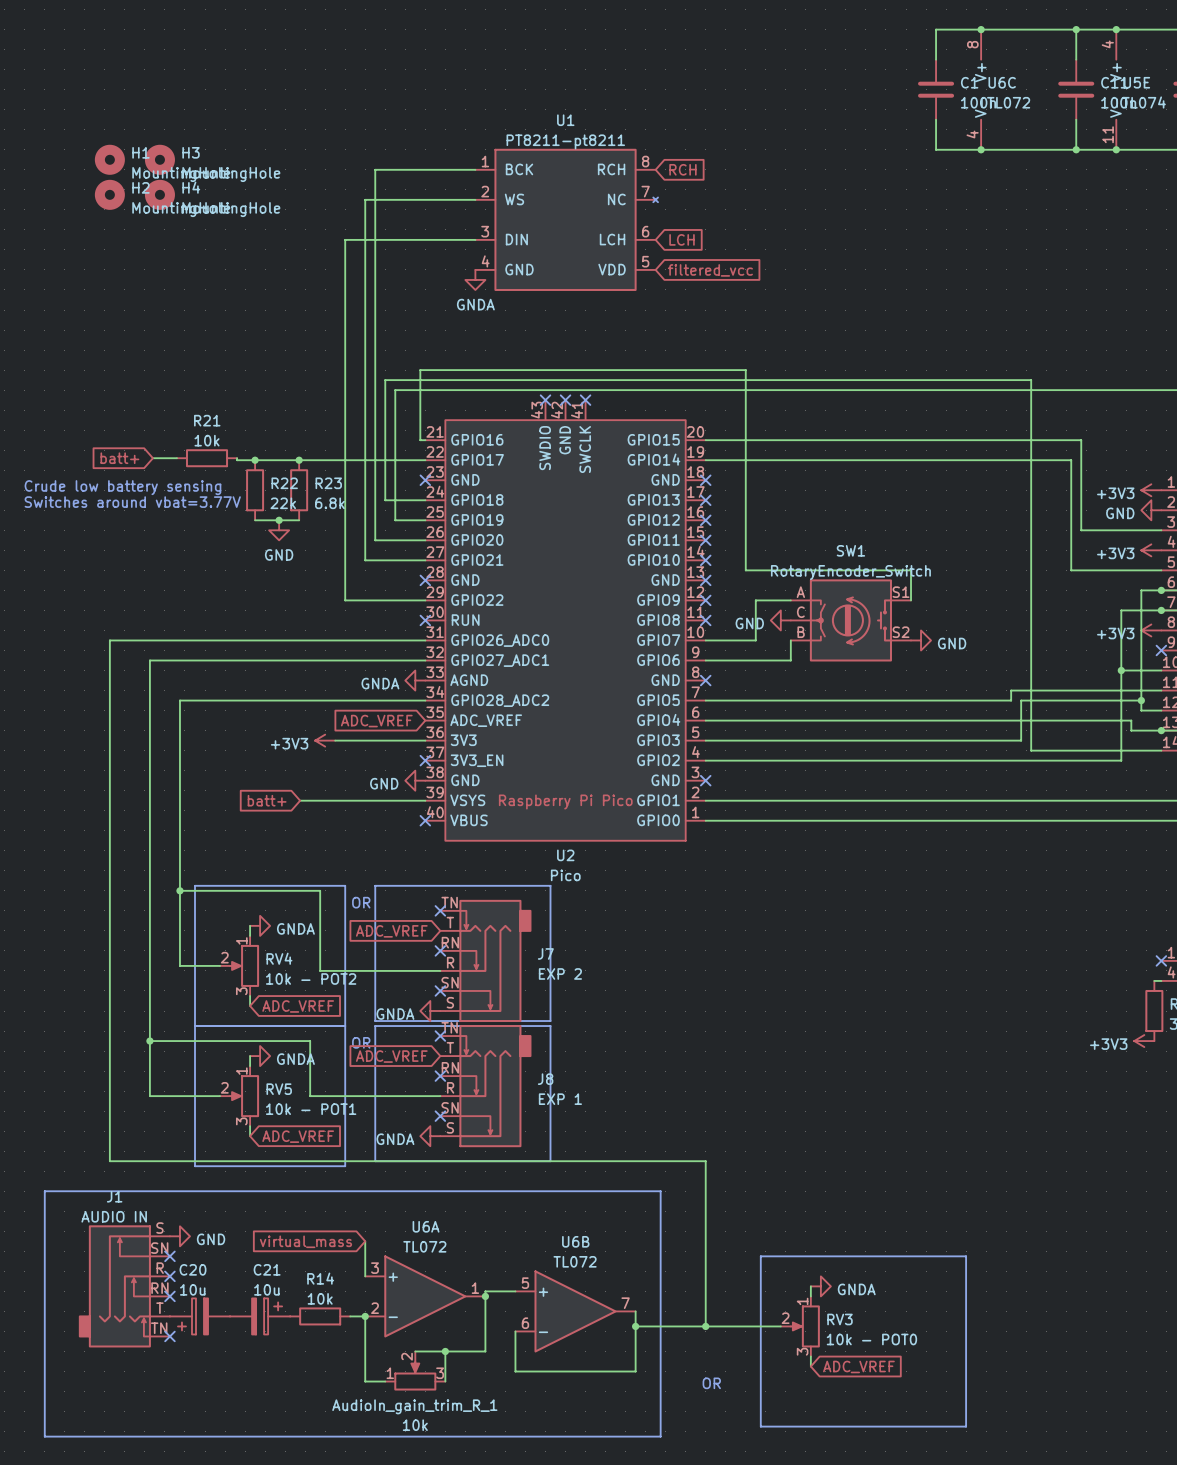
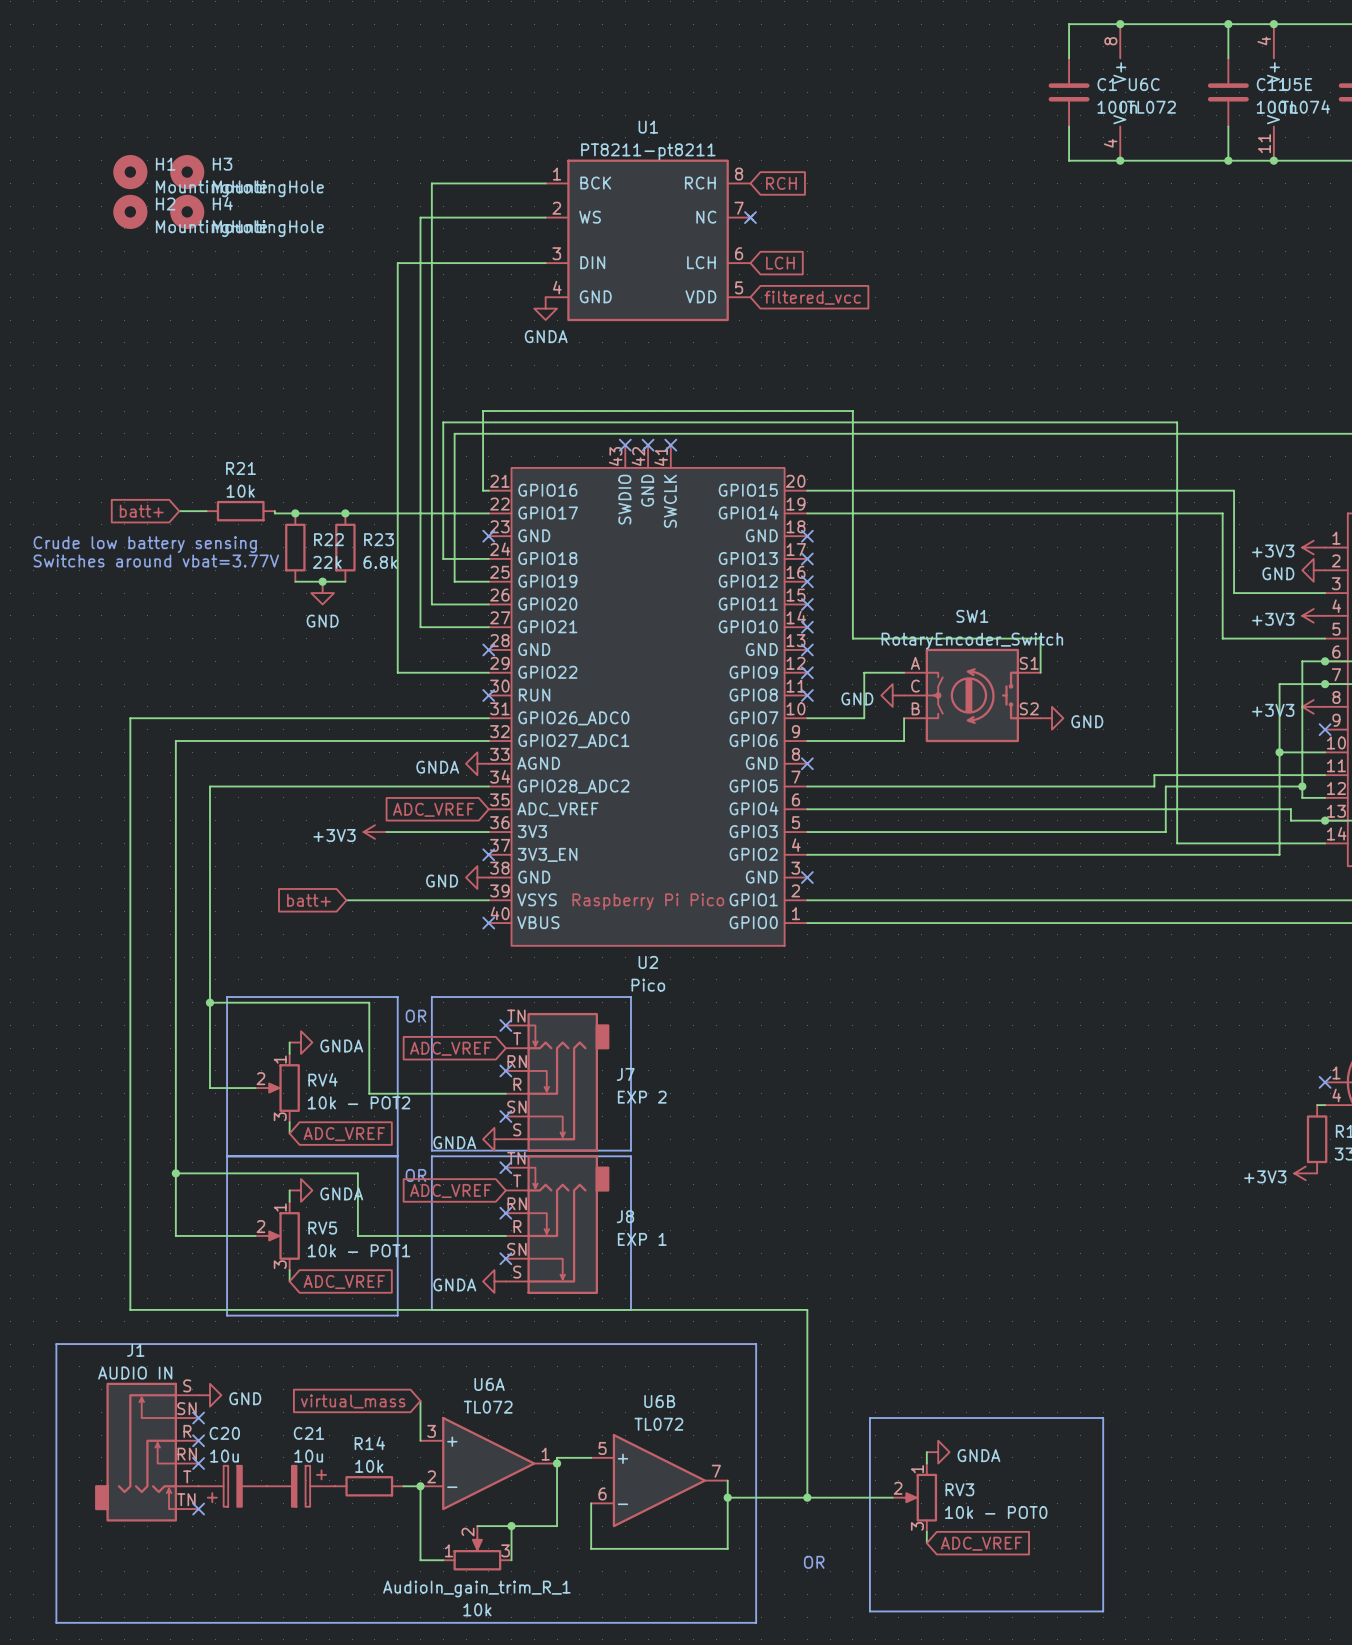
no-connect mark: none -> (750, 217)

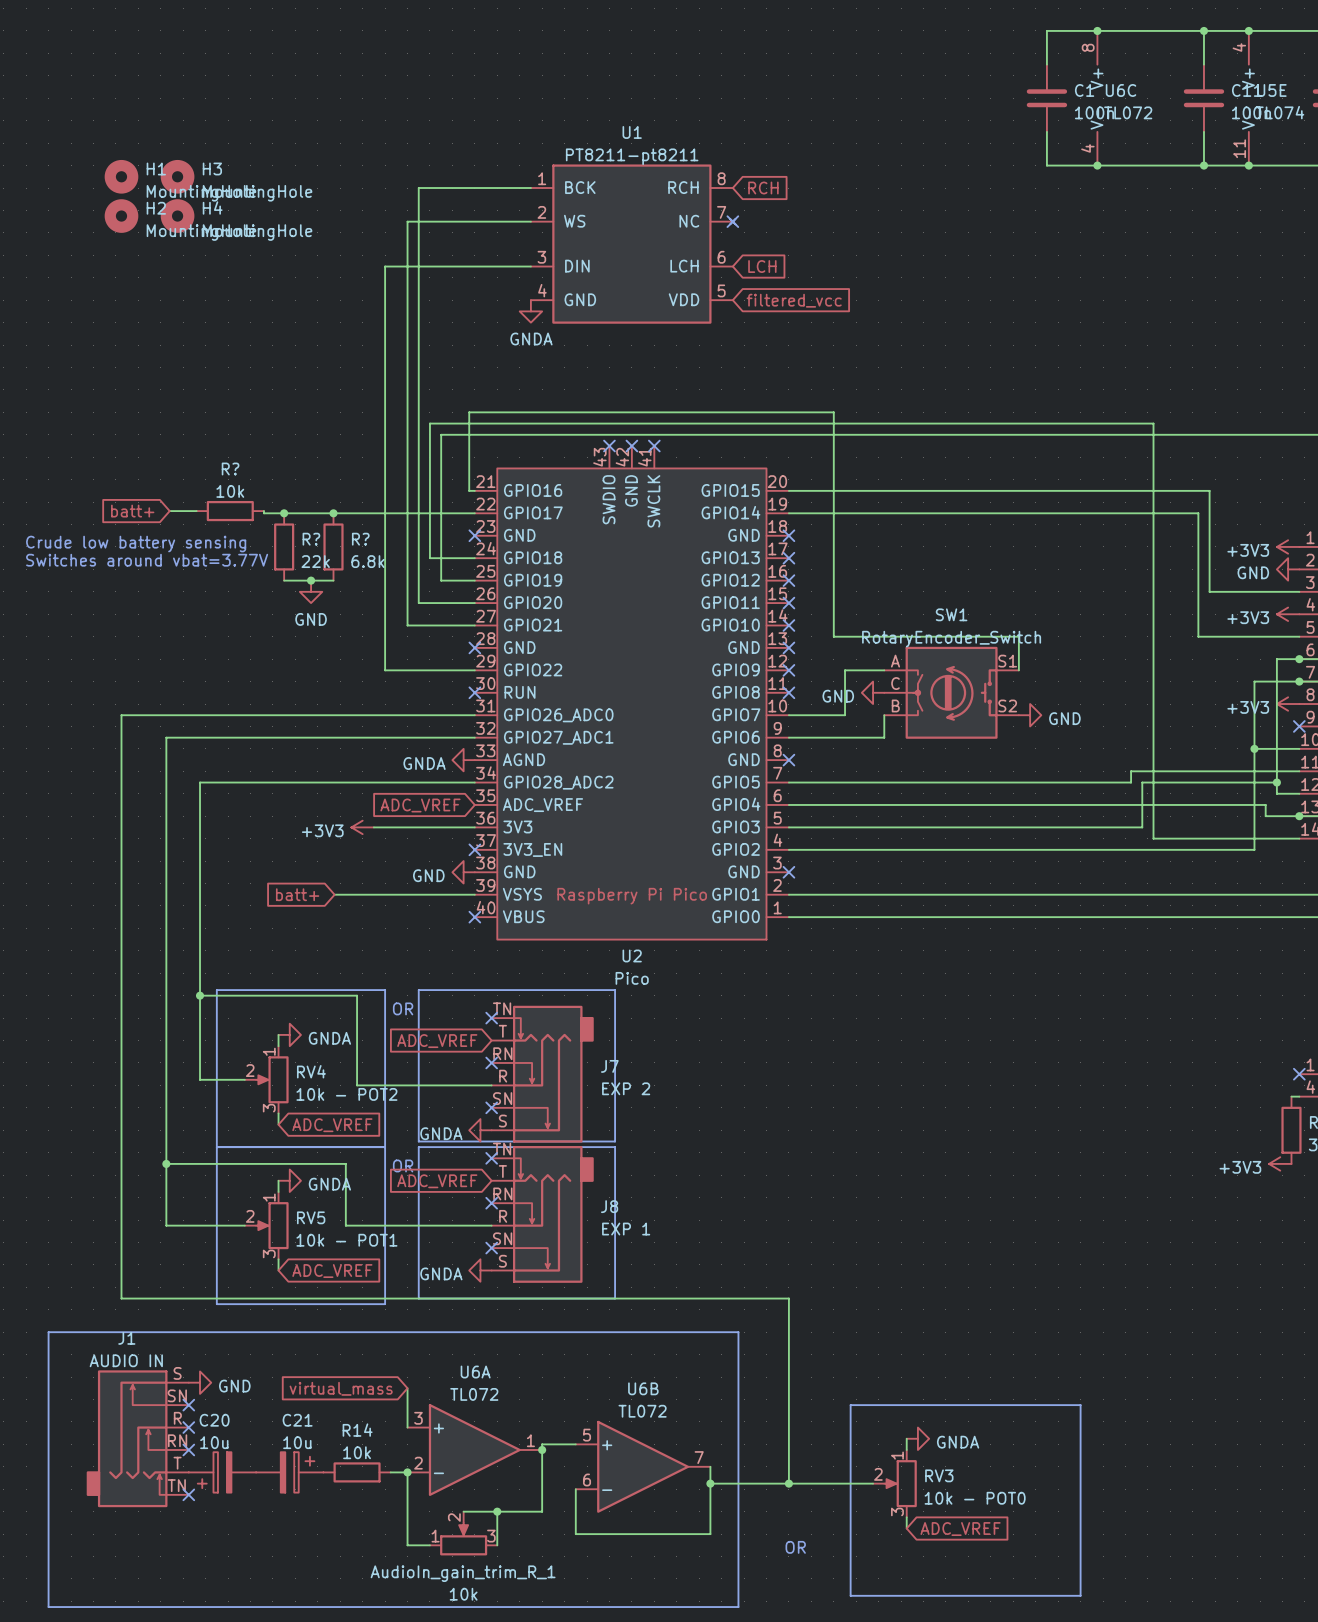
R21 name: R21 (240, 468) -> R? (230, 469)
R22 name: R22 (328, 539) -> R? (311, 539)
R23 name: R23 (379, 539) -> R? (360, 539)

